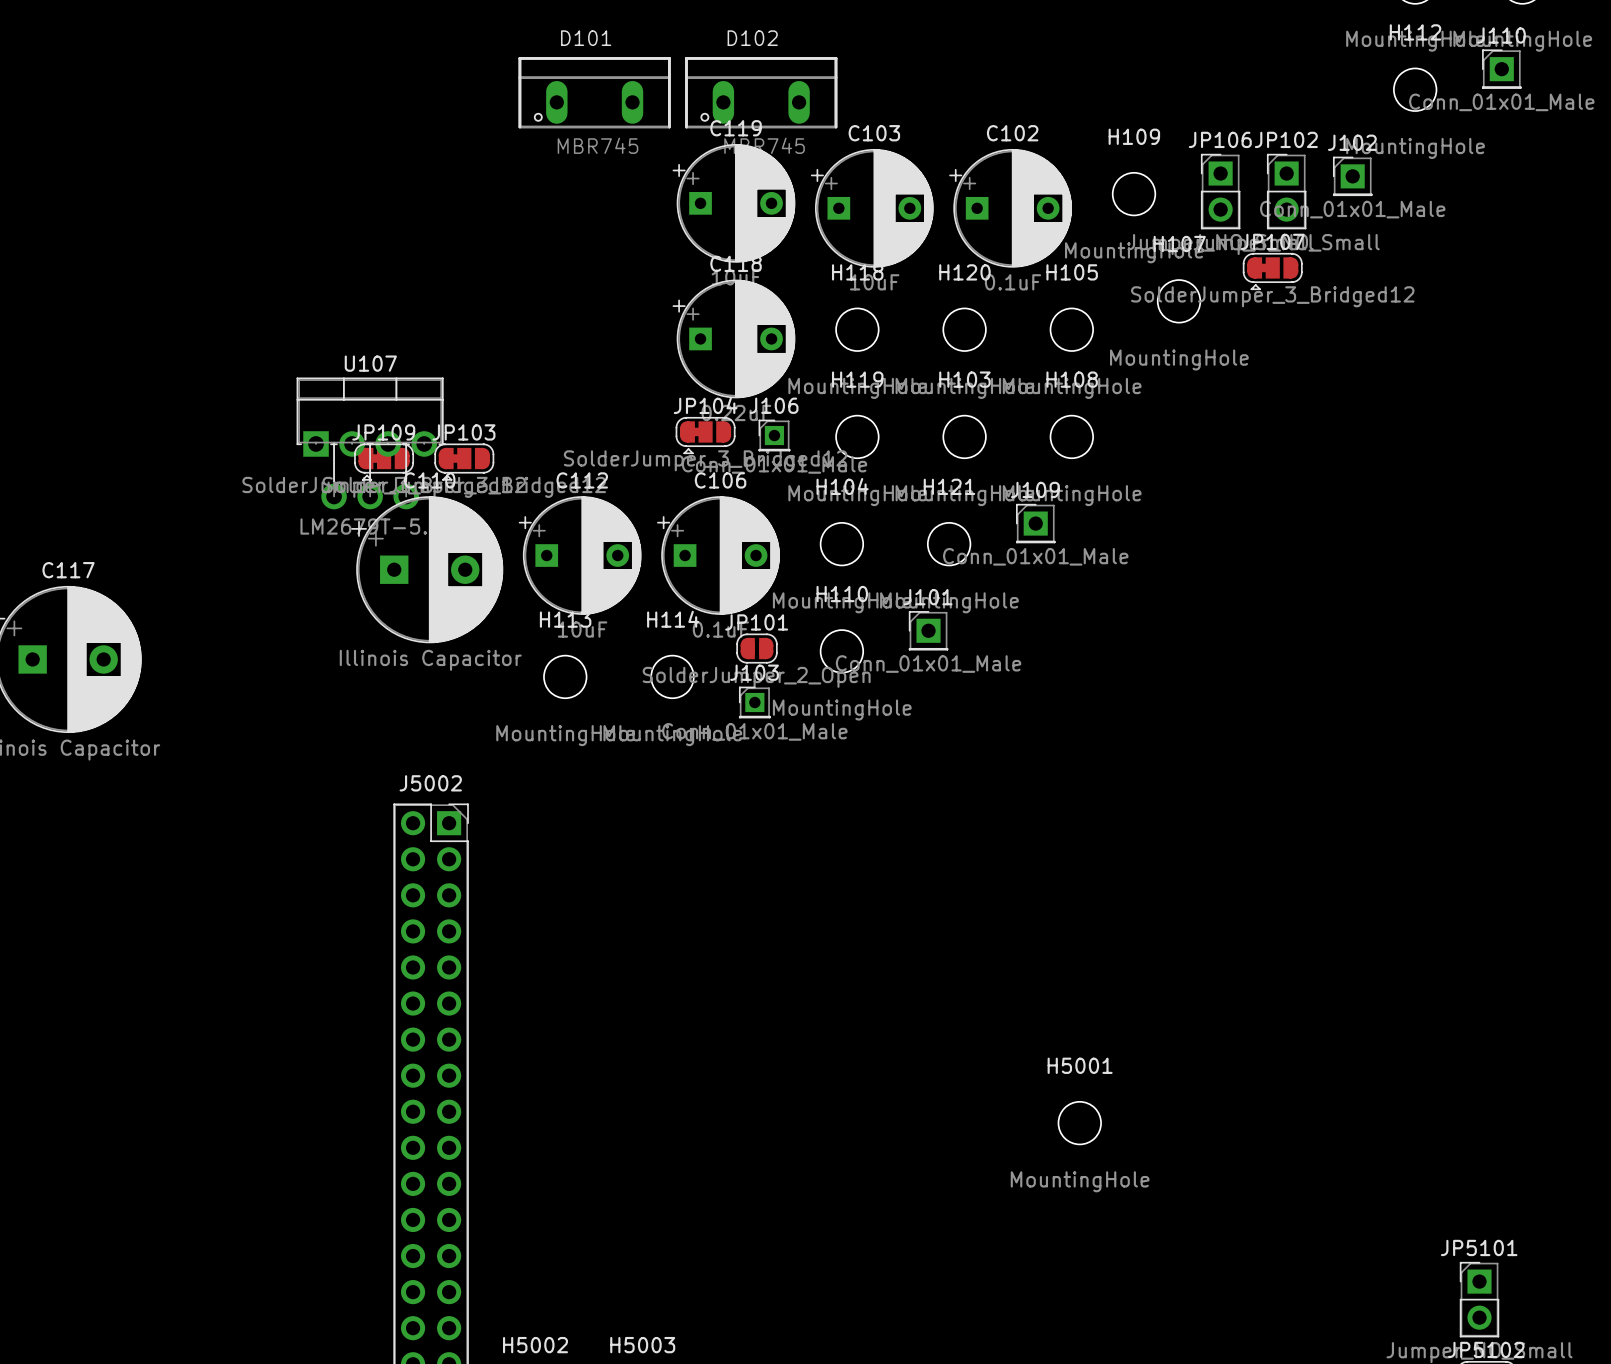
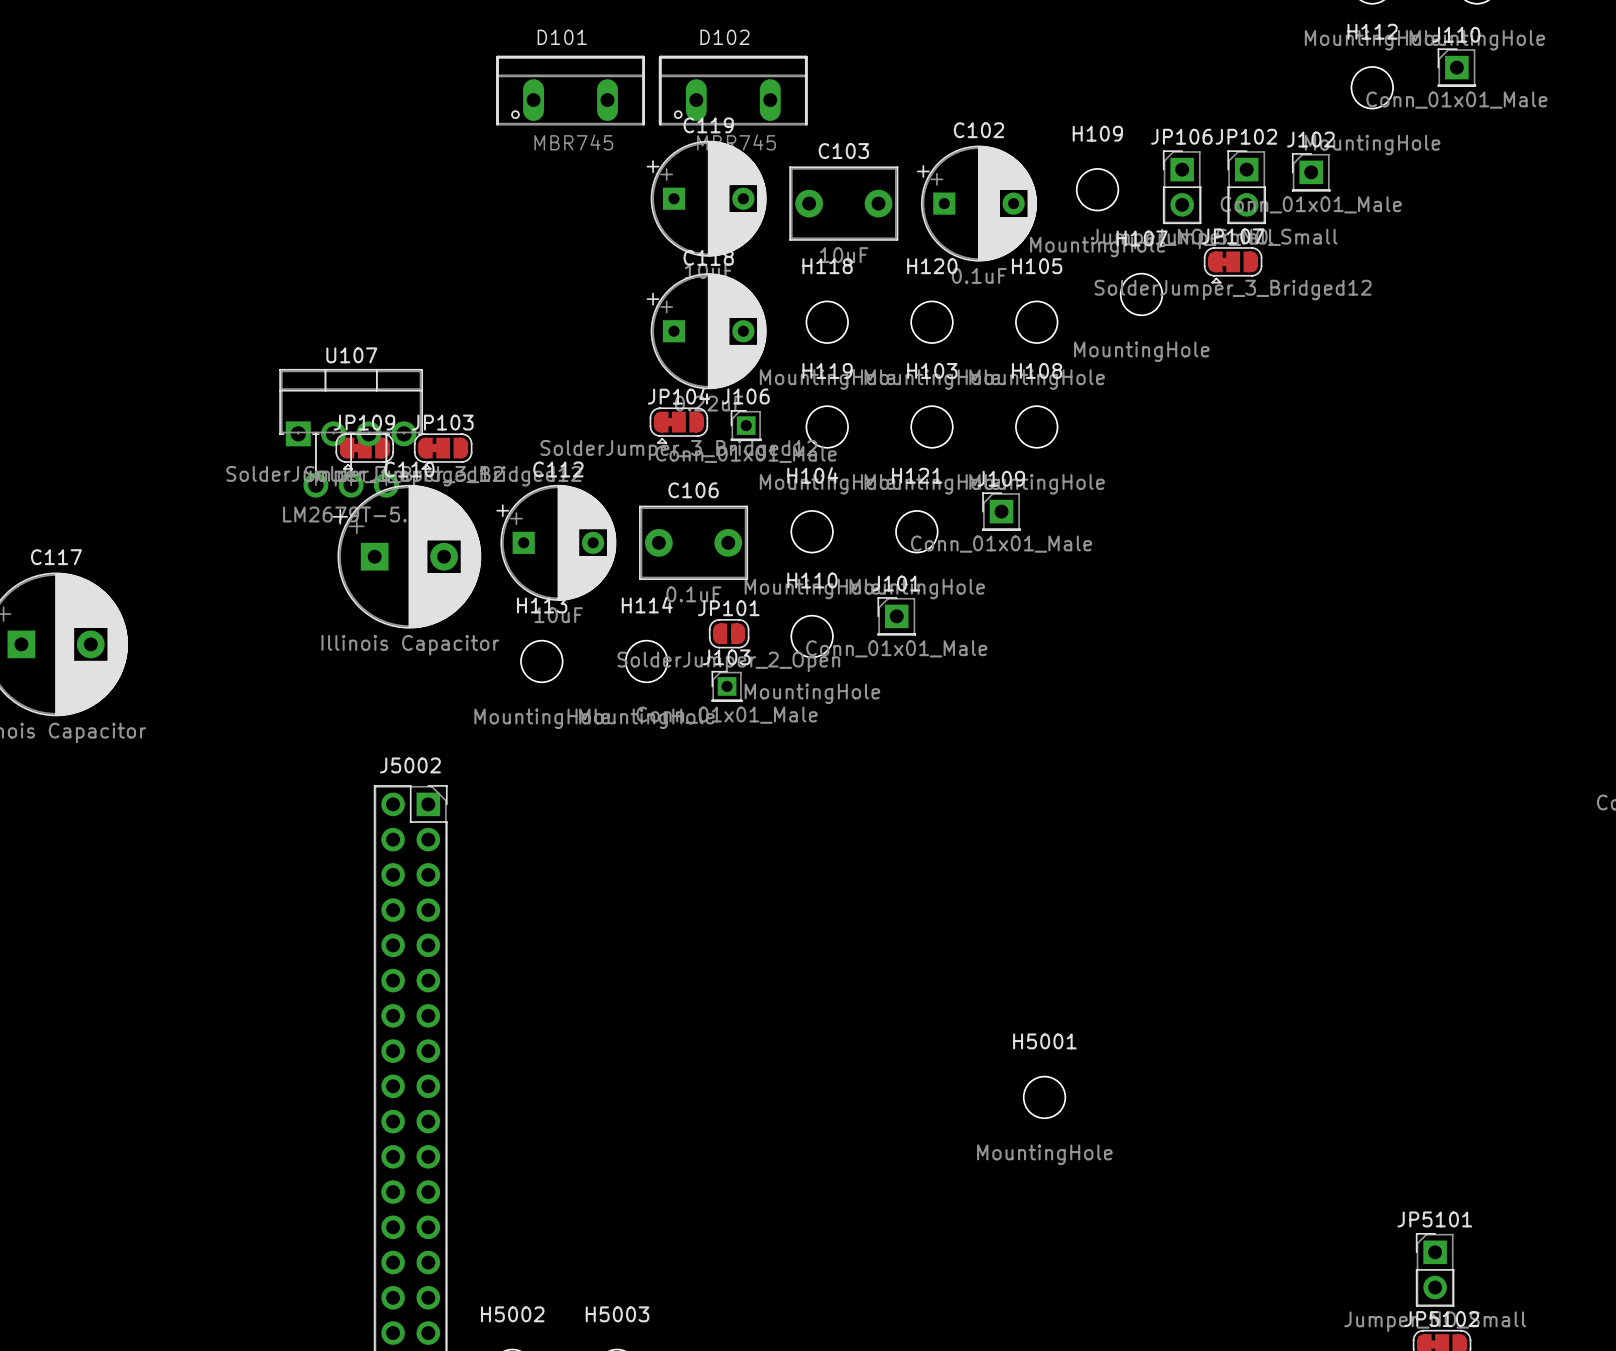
C103 footprint: [810, 148, 934, 268] -> [789, 166, 899, 241]
C106 footprint: [657, 496, 780, 615] -> [639, 505, 749, 581]

